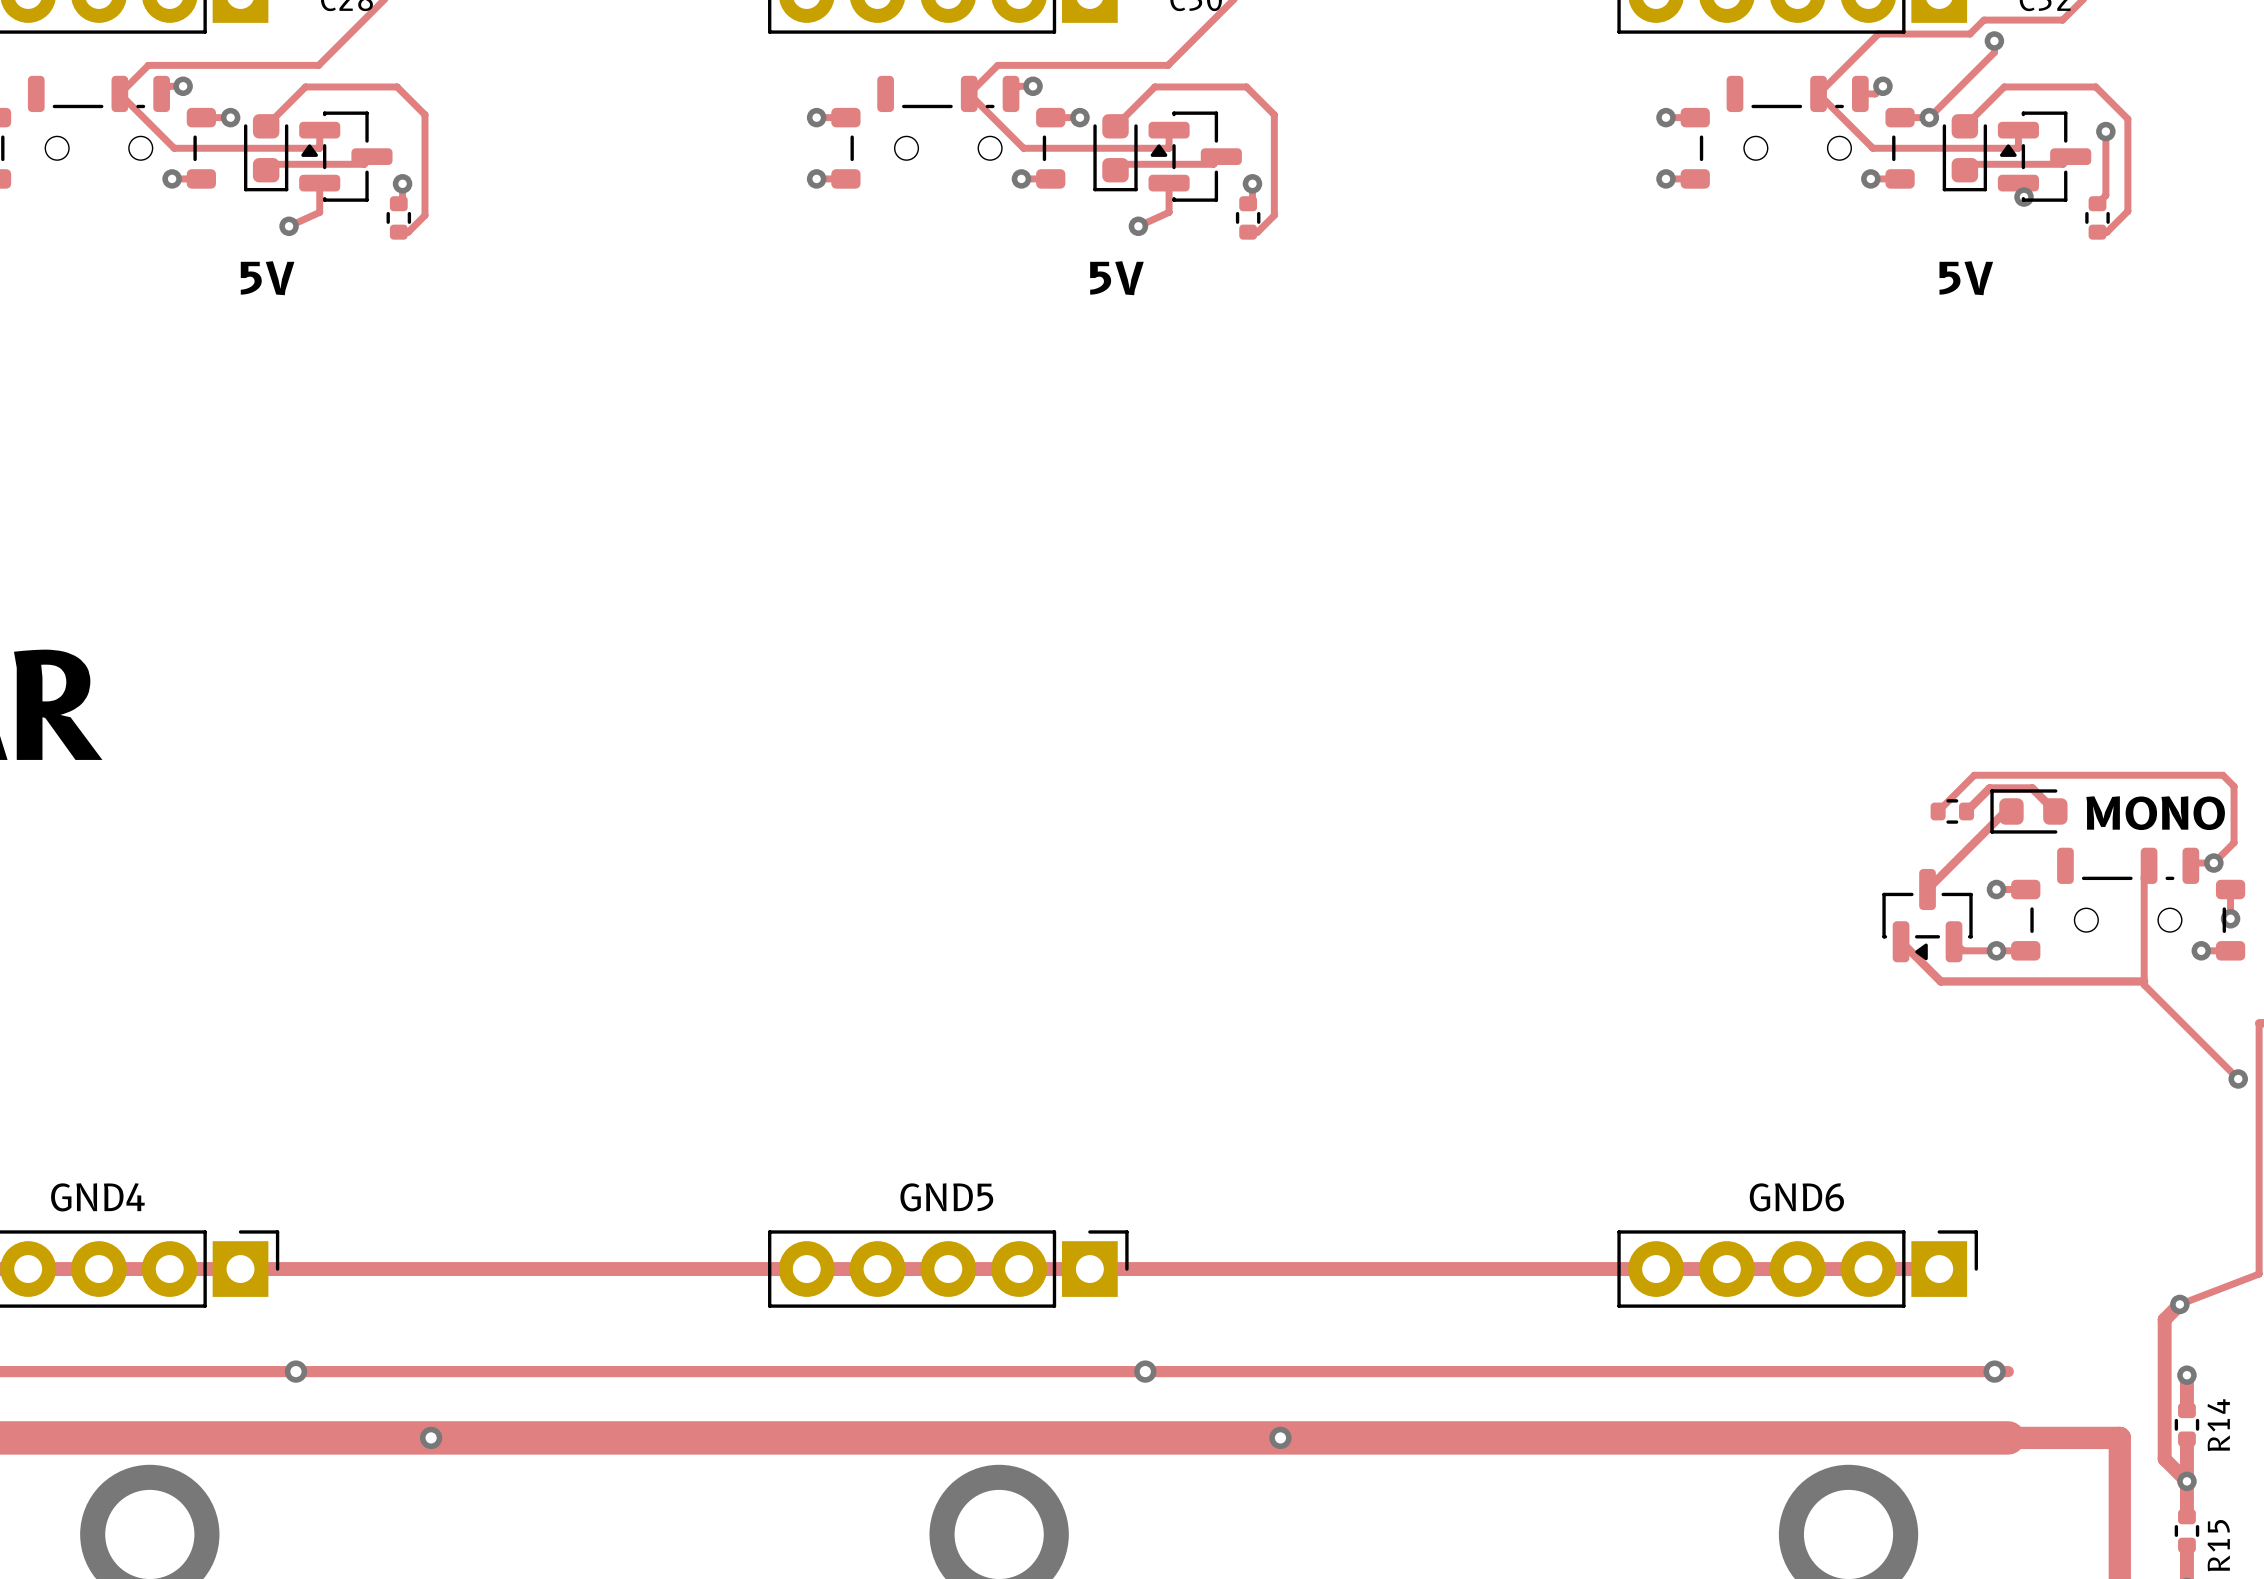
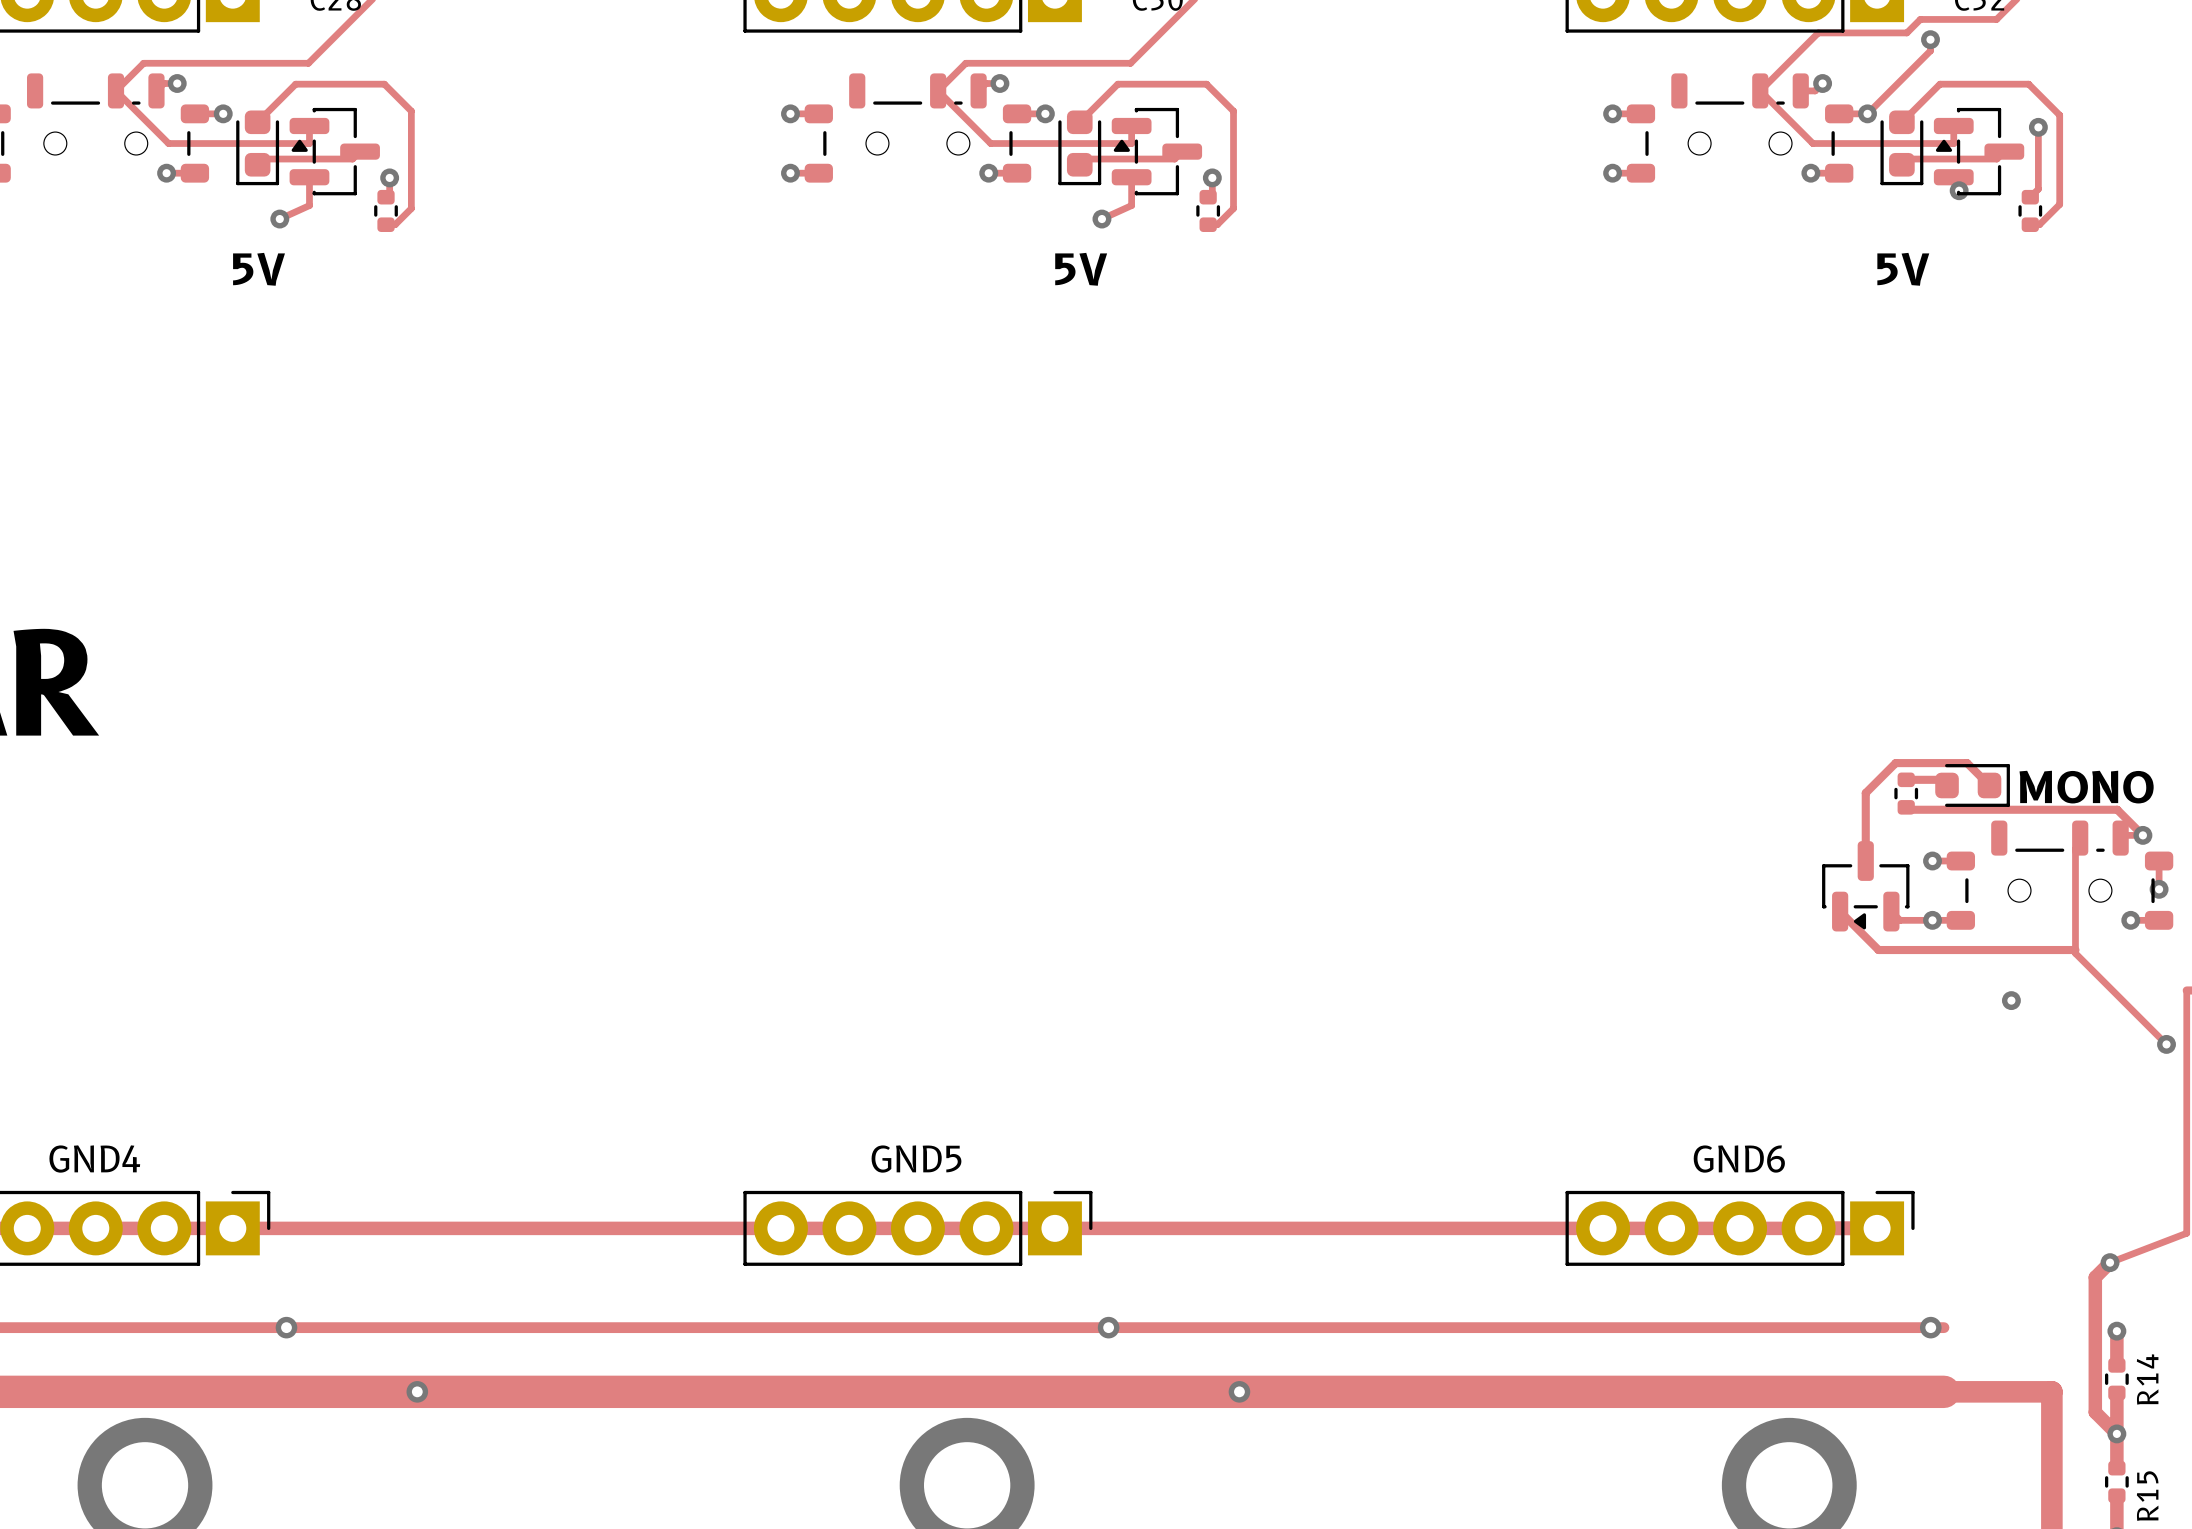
track: (2032, 788) (1989, 788) (1966, 811) -> none
track: none -> (1906, 779) (1941, 779)
track: (1938, 811) (1974, 775) (2222, 775) (2234, 786) (2234, 842) (2213, 863) -> (1906, 807) (1908, 809) (2117, 809) (2142, 835)
part rotation: 0° (1952, 811) -> 90° clockwise (1906, 793)
track: (2011, 811) (2005, 811) (1927, 889) -> (1967, 763) (1895, 763) (1865, 793) (1865, 861)
part rotation: 0° (2028, 811) -> 180° (1972, 785)
via: none -> (2011, 1000)

